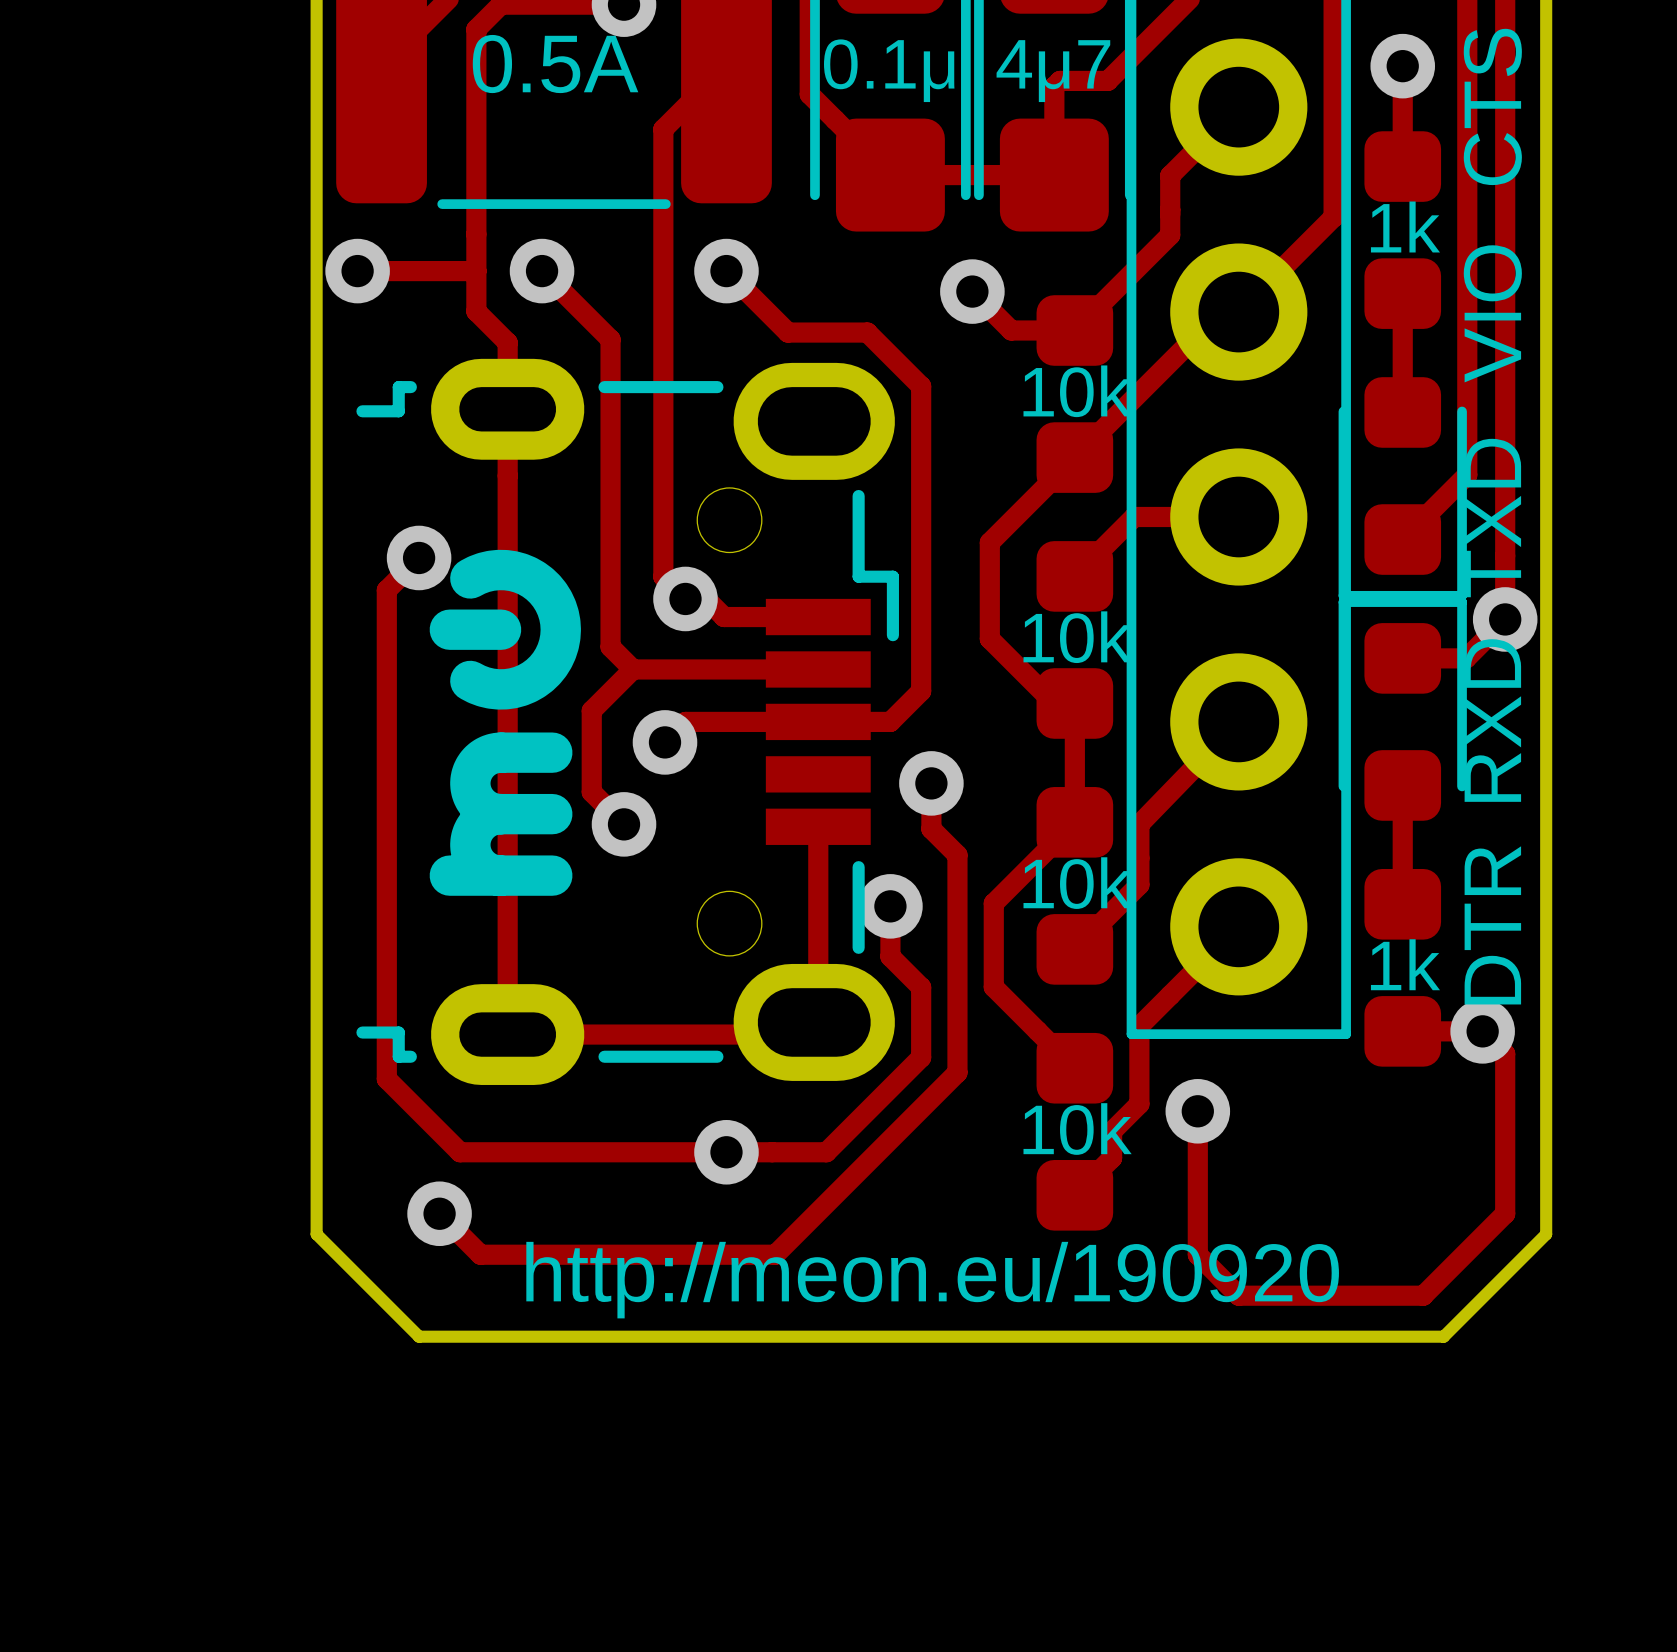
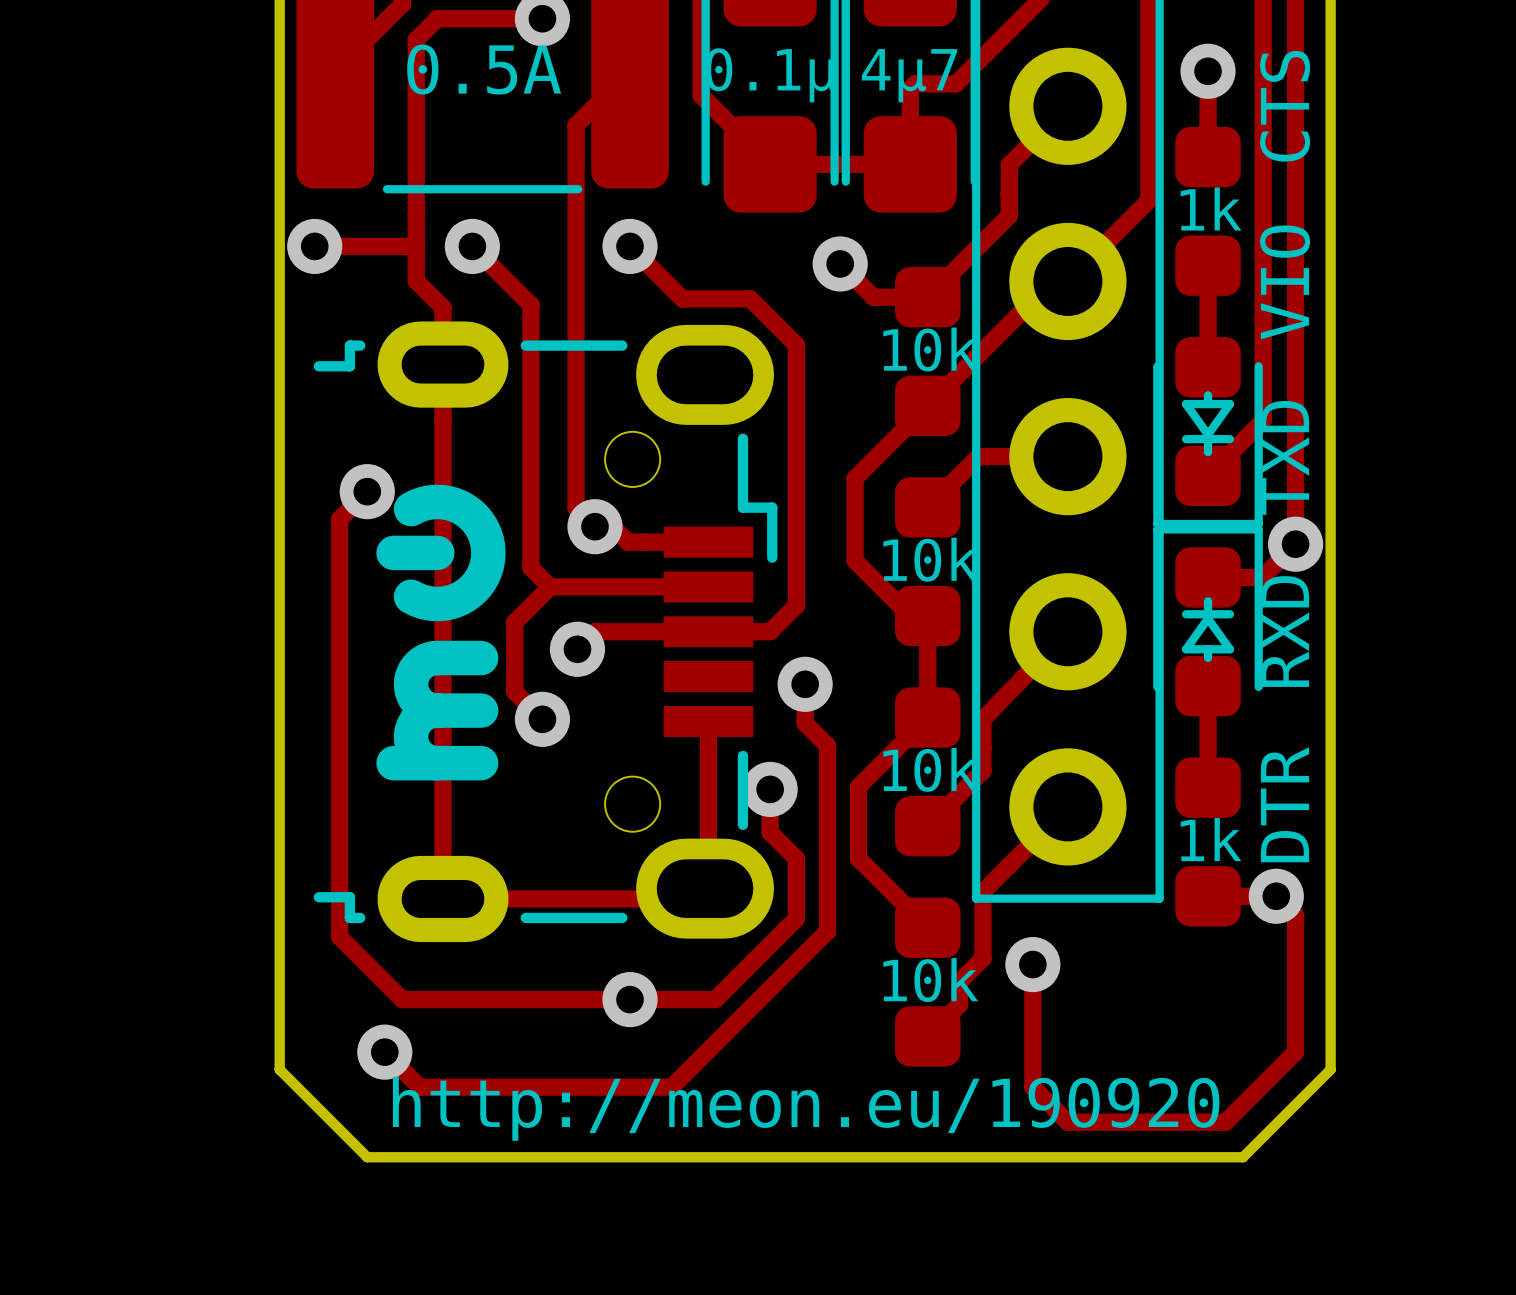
part footprint: [1338, 377, 1467, 601] -> [1153, 337, 1263, 529]
part footprint: [1338, 597, 1467, 821] -> [1153, 525, 1263, 717]

